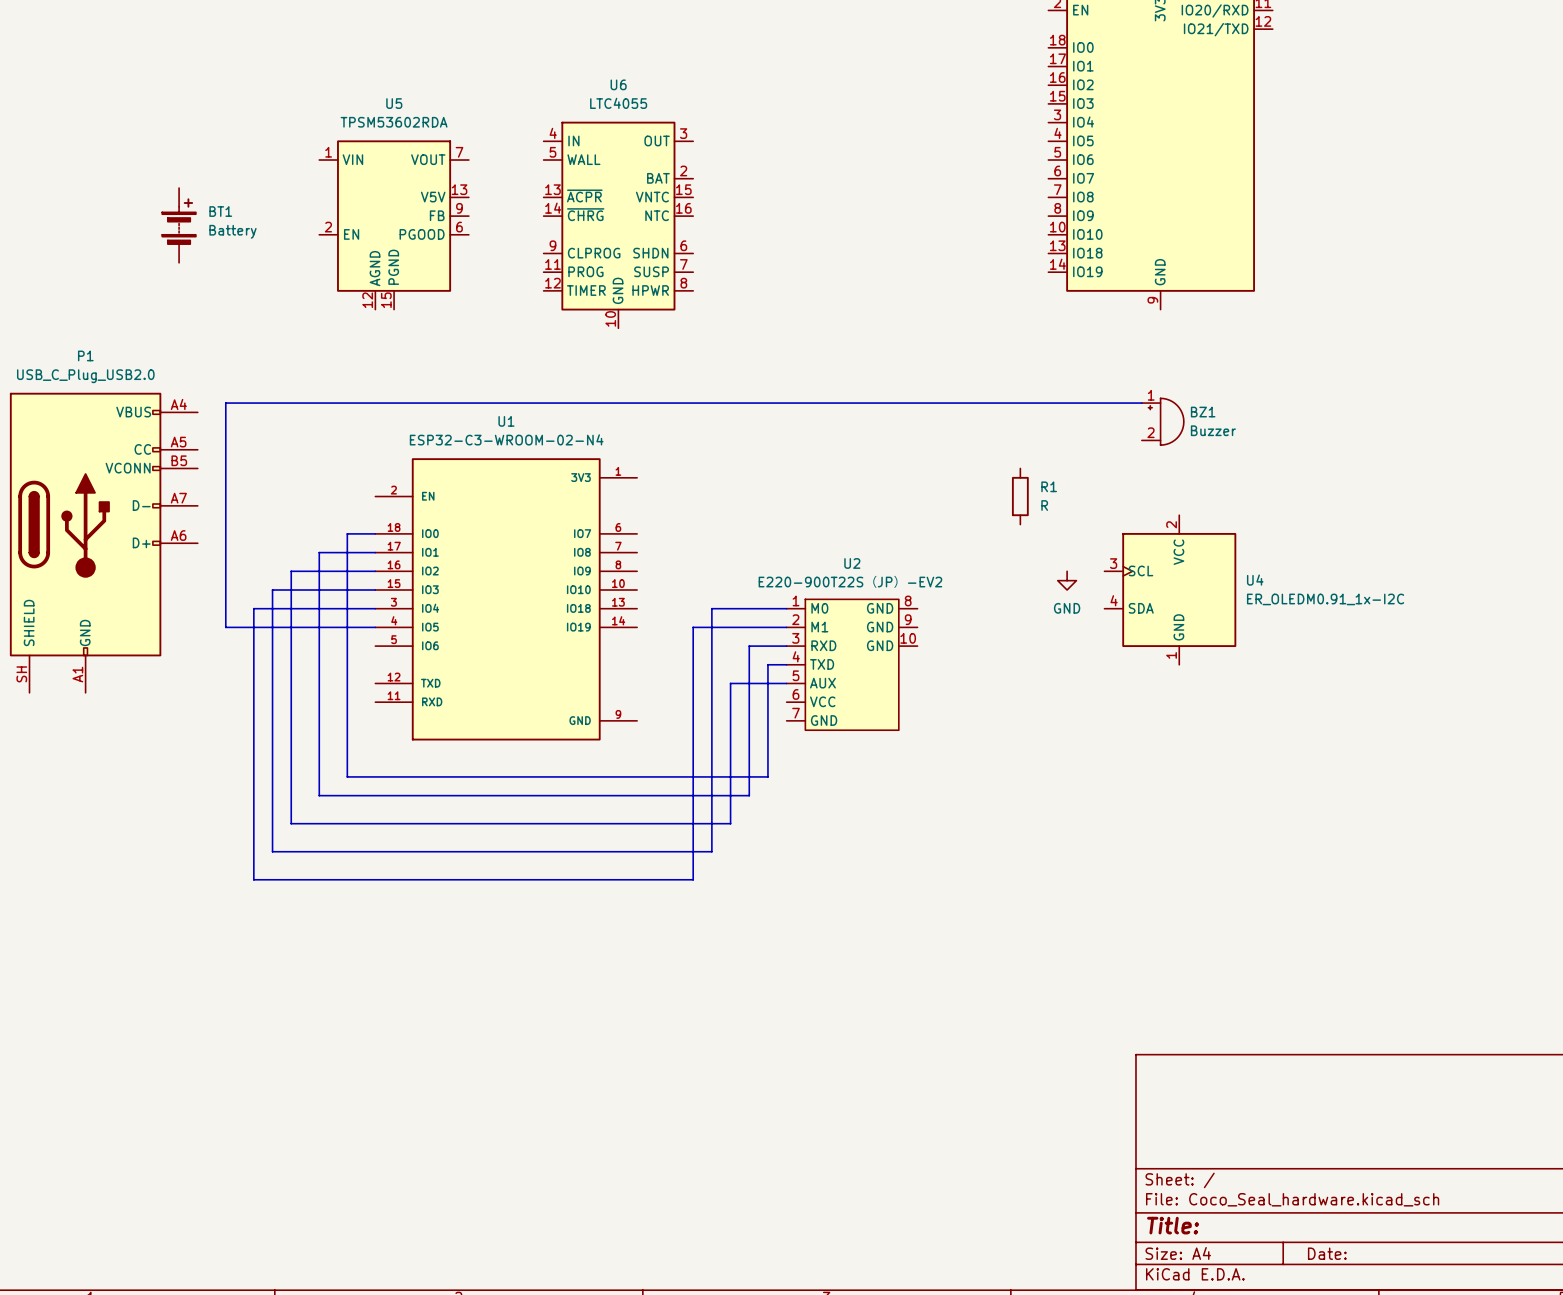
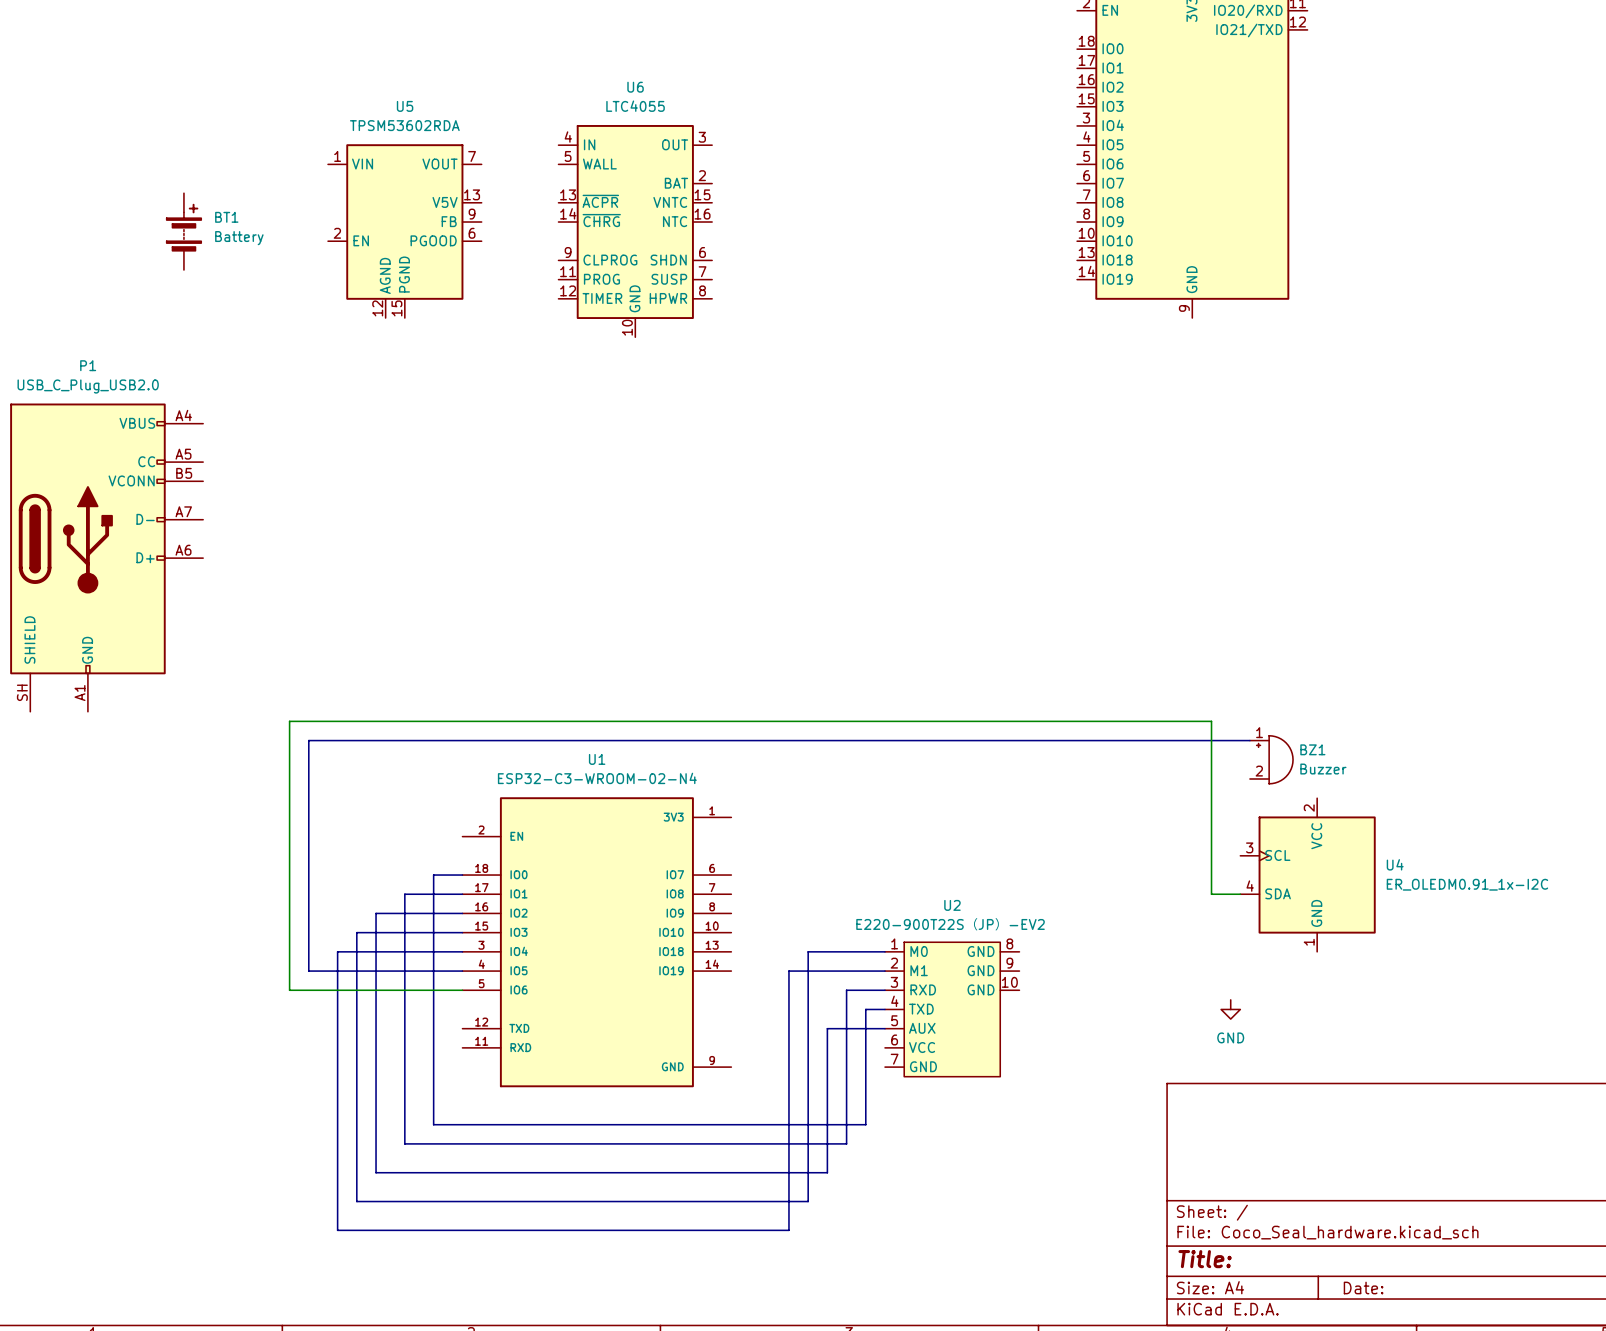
bus: (1141, 403) (225, 403) (225, 627) (375, 627) -> none
BZ1 position: (1162, 421) -> (1271, 759)
R1: R (1020, 496) -> none
bus: (375, 533) (347, 533) (347, 776) (767, 776) (767, 664) (786, 664) -> none
bus: (375, 552) (319, 552) (319, 795) (749, 795) (749, 646) (786, 646) -> none
bus: (375, 571) (291, 571) (291, 823) (730, 823) (730, 683) (786, 683) -> none
power symbol: GND (1067, 580) -> none
bus: (375, 590) (272, 590) (272, 851) (422, 851) -> (885, 1009) (865, 1009) (865, 1124) (433, 1124) (433, 875)
U4 position: (1170, 590) -> (1308, 875)
U1 position: (506, 599) -> (596, 942)
bus: (375, 608) (253, 608) (253, 879) (693, 879) (693, 627) (786, 627) -> none
bus: (786, 608) (711, 608) (711, 851) (450, 851) -> none
U2 position: (852, 664) -> (952, 1009)
bus: none -> (1249, 740) (308, 740) (308, 971) (462, 971)
bus: none -> (462, 894) (404, 894) (404, 1143) (846, 1143) (846, 990) (885, 990)
wire: none -> (1240, 894) (1211, 894) (1211, 721) (289, 721) (289, 990) (462, 990)
bus: none -> (462, 913) (376, 913) (376, 1172) (827, 1172) (827, 1028) (885, 1028)
bus: none -> (462, 932) (356, 932) (356, 1201) (808, 1201) (808, 951) (885, 951)
bus: none -> (462, 951) (337, 951) (337, 1230) (788, 1230) (788, 971) (885, 971)
power symbol: none -> GND (1230, 1009)

